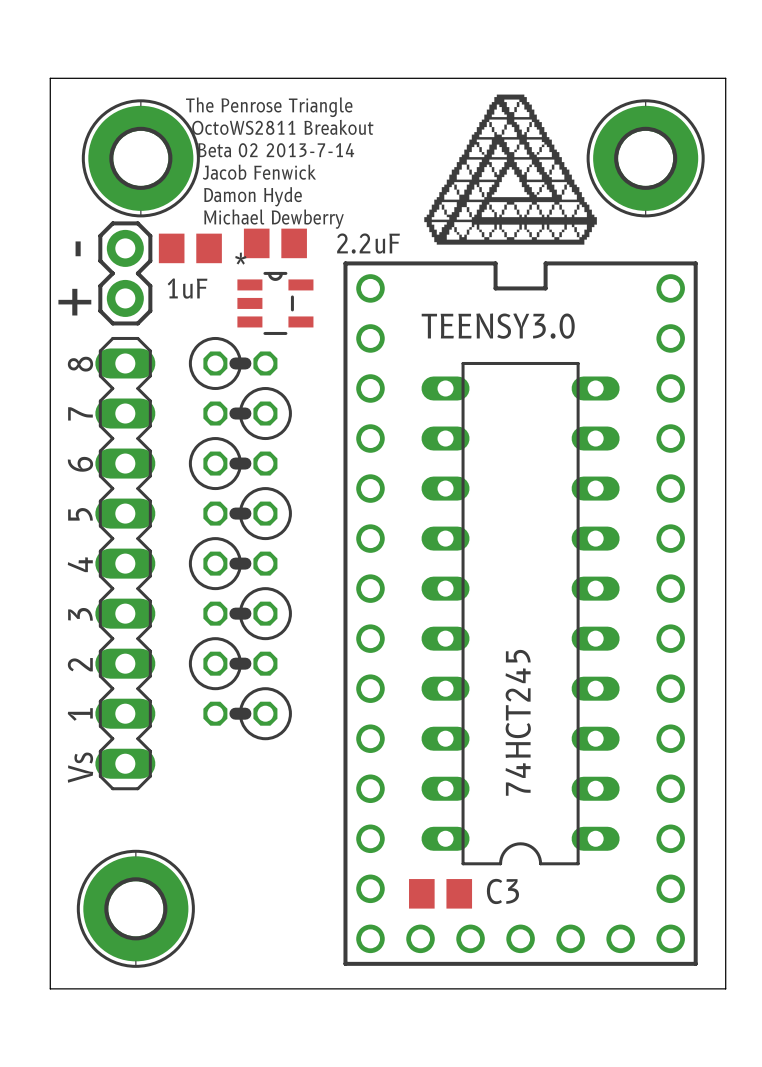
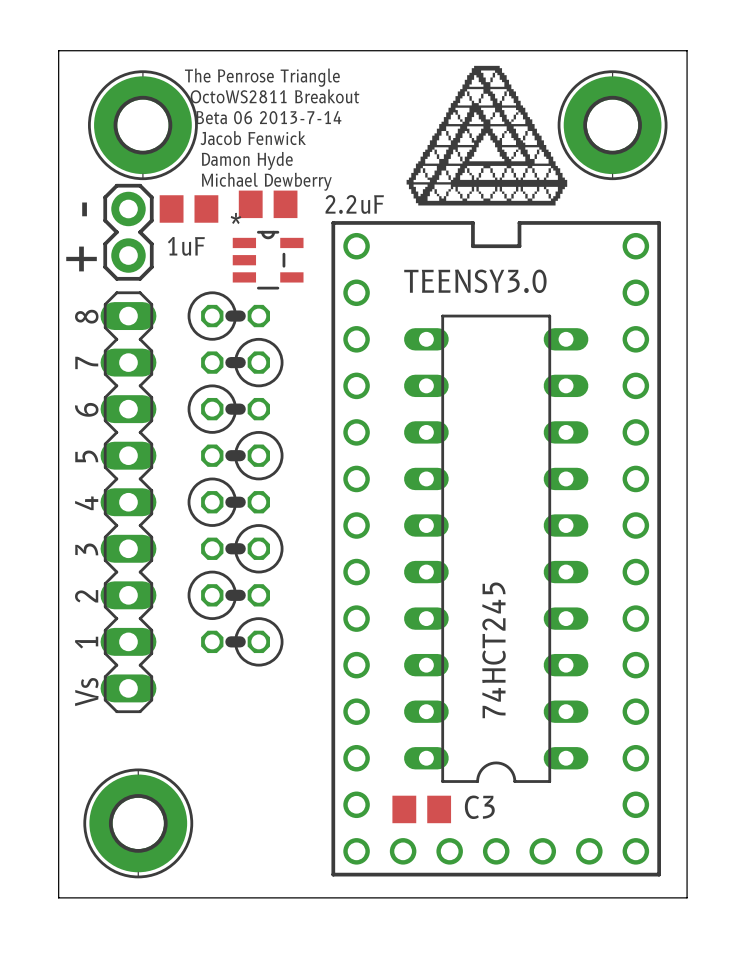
text: Beta 02 2013-7-14 (276, 150) -> Beta 06 2013-7-14 (268, 117)

